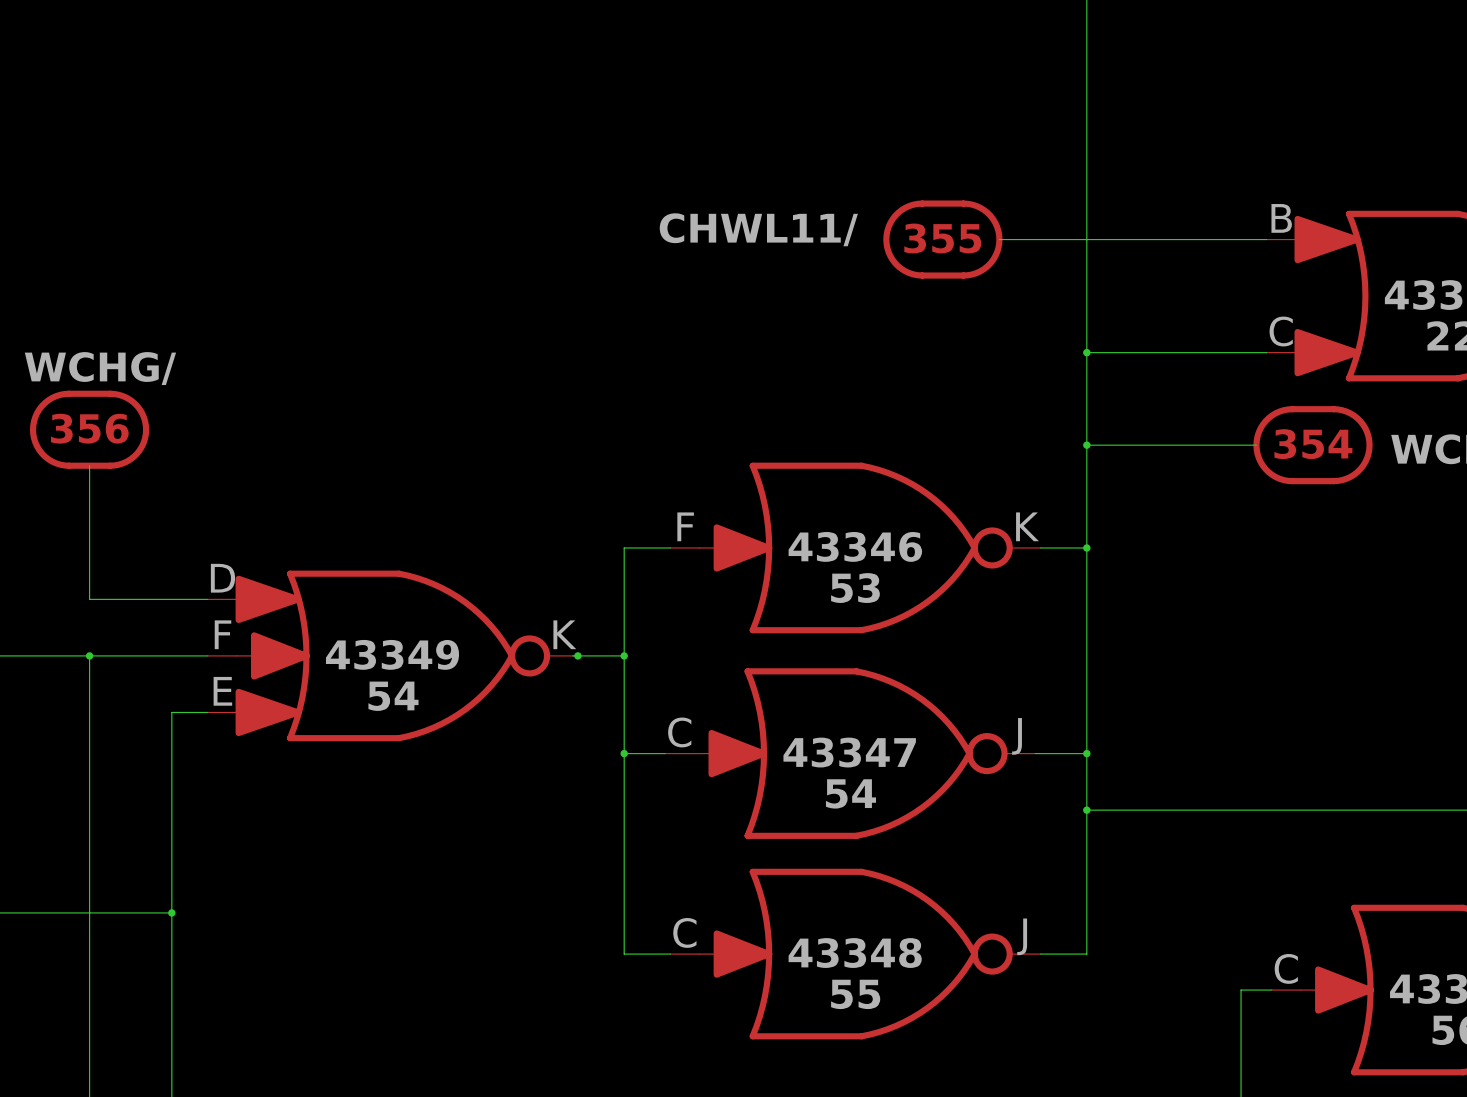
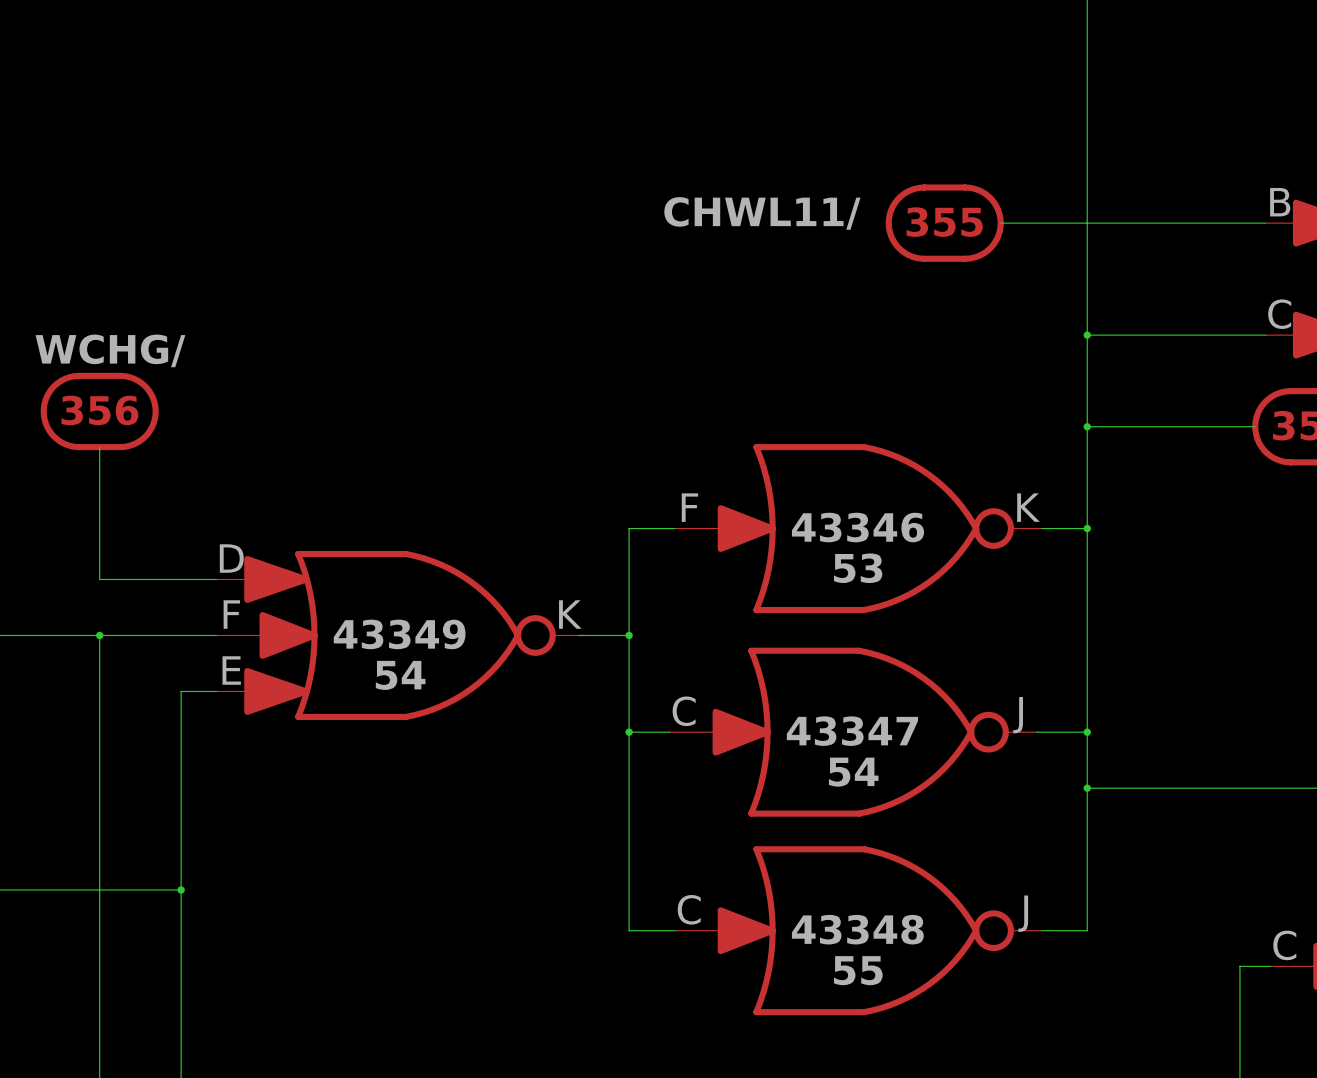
junction: (577, 655) -> none

